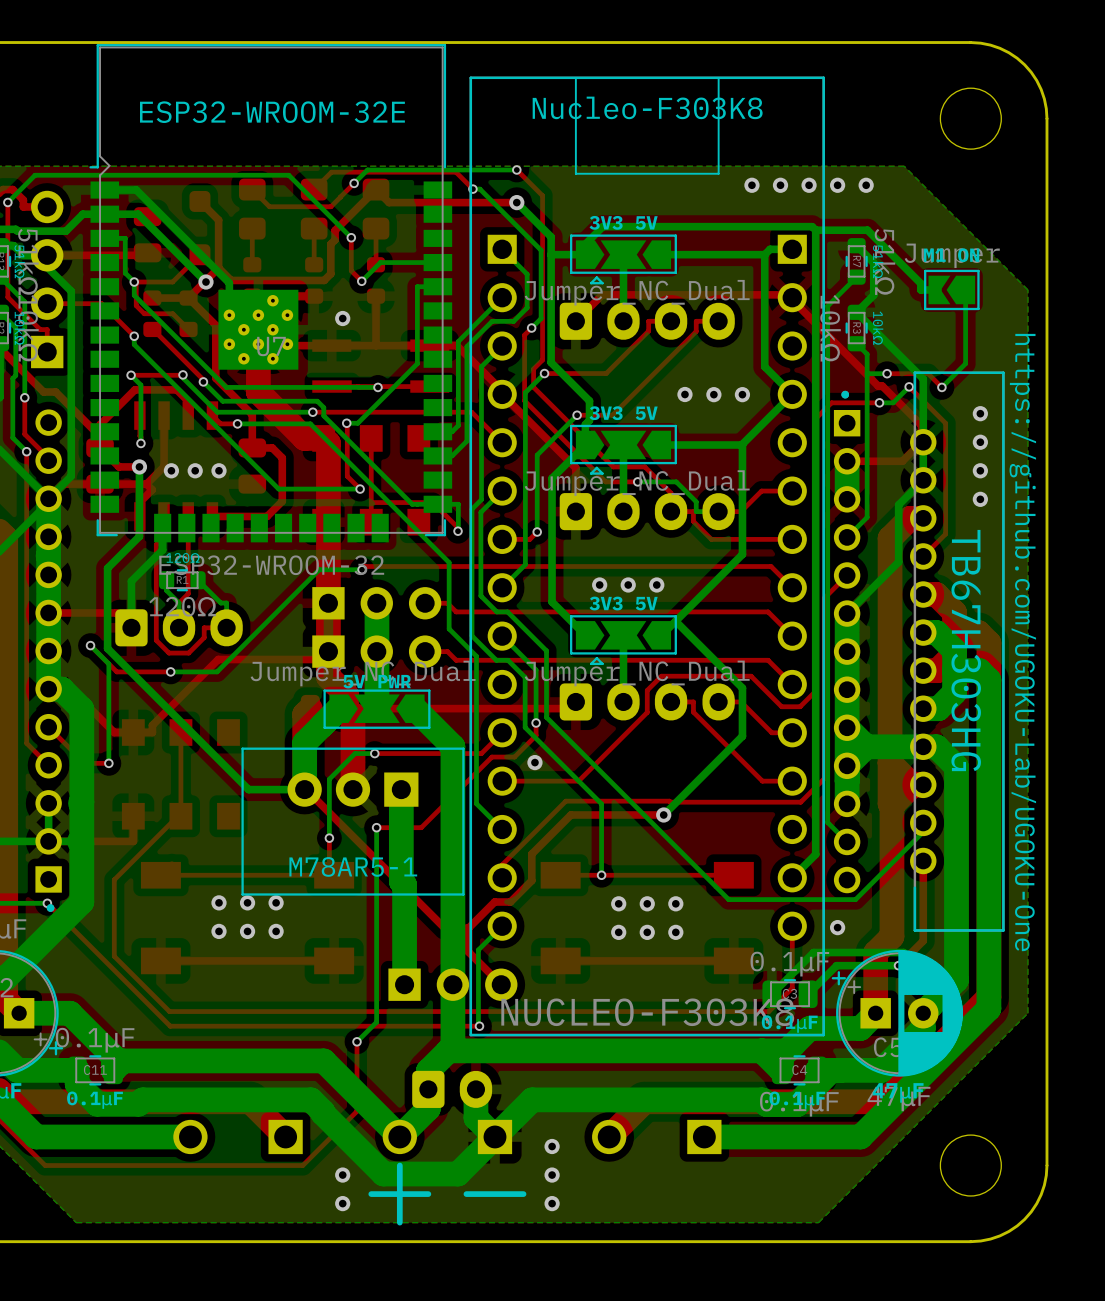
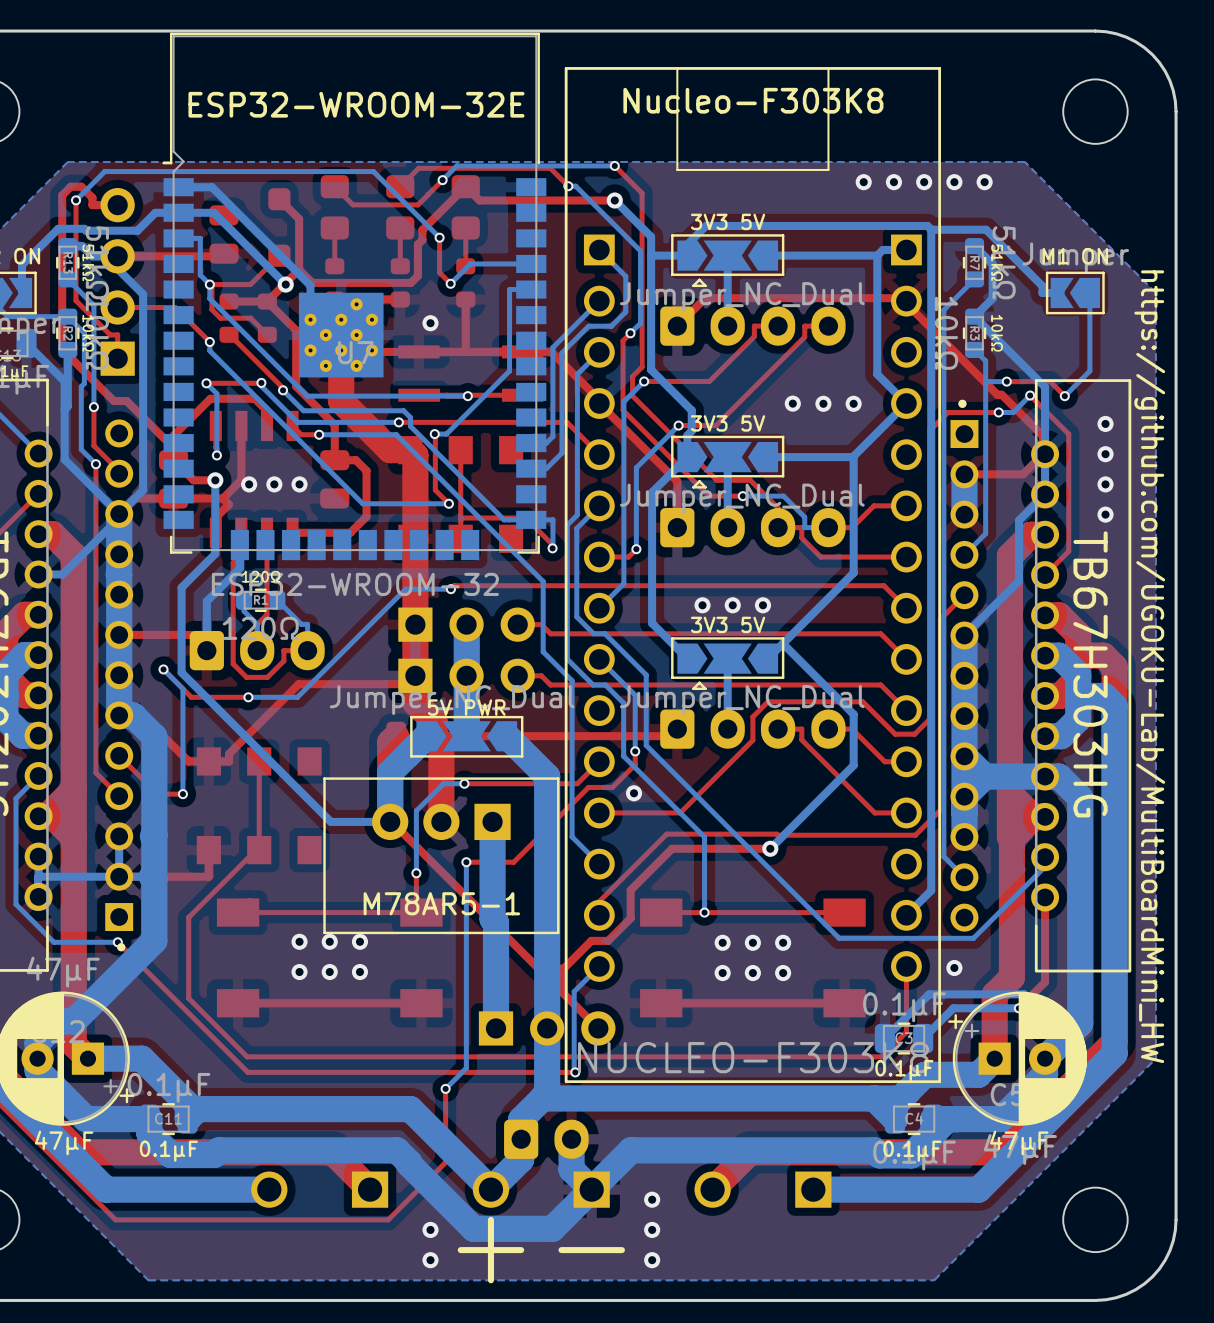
text: https://github.com/UGOKU-Lab/UGOKU-One (1022, 642) -> https://github.com/UGOKU-Lab/MultiBoardMini_HW (1149, 666)

